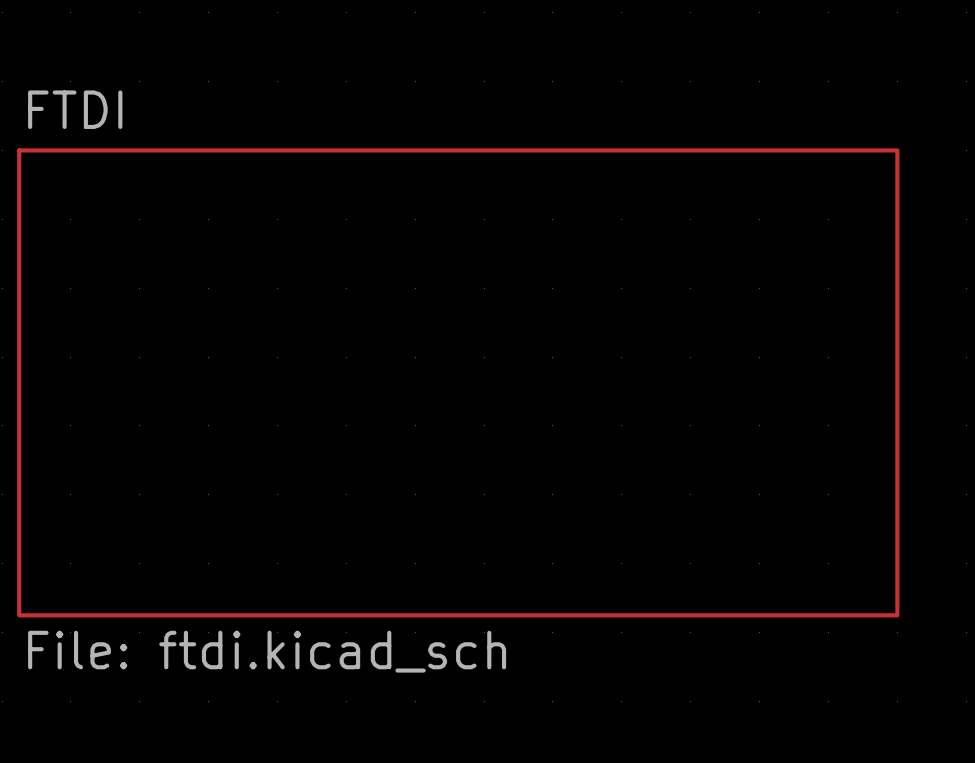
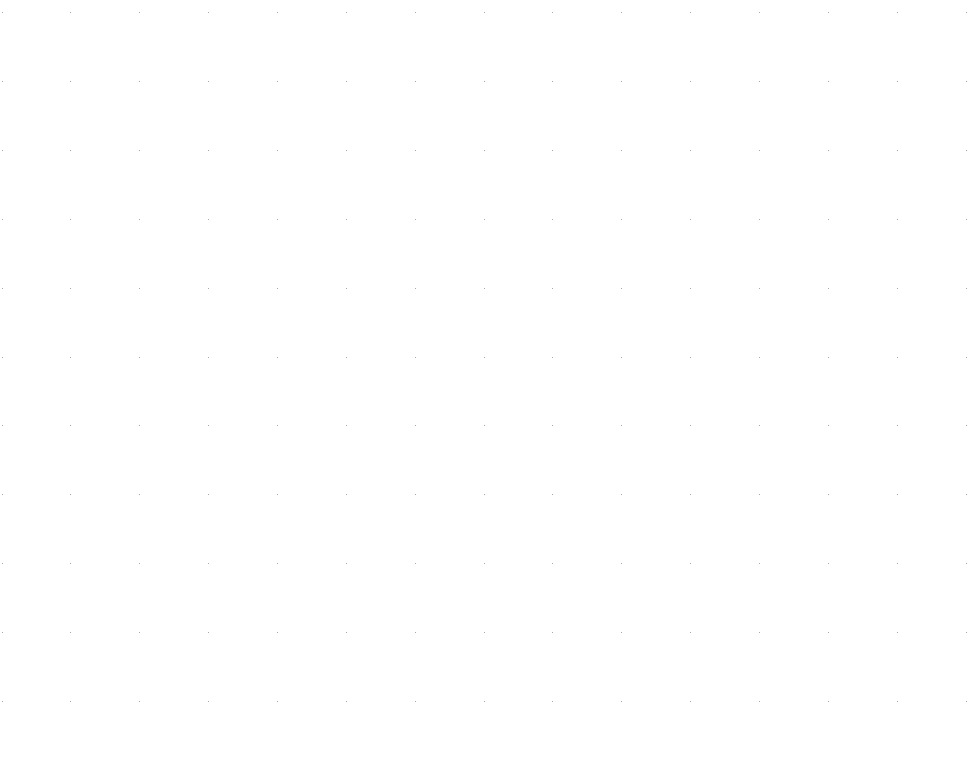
sheet FTDI: File: ftdi.kicad_sch (458, 382) -> none

